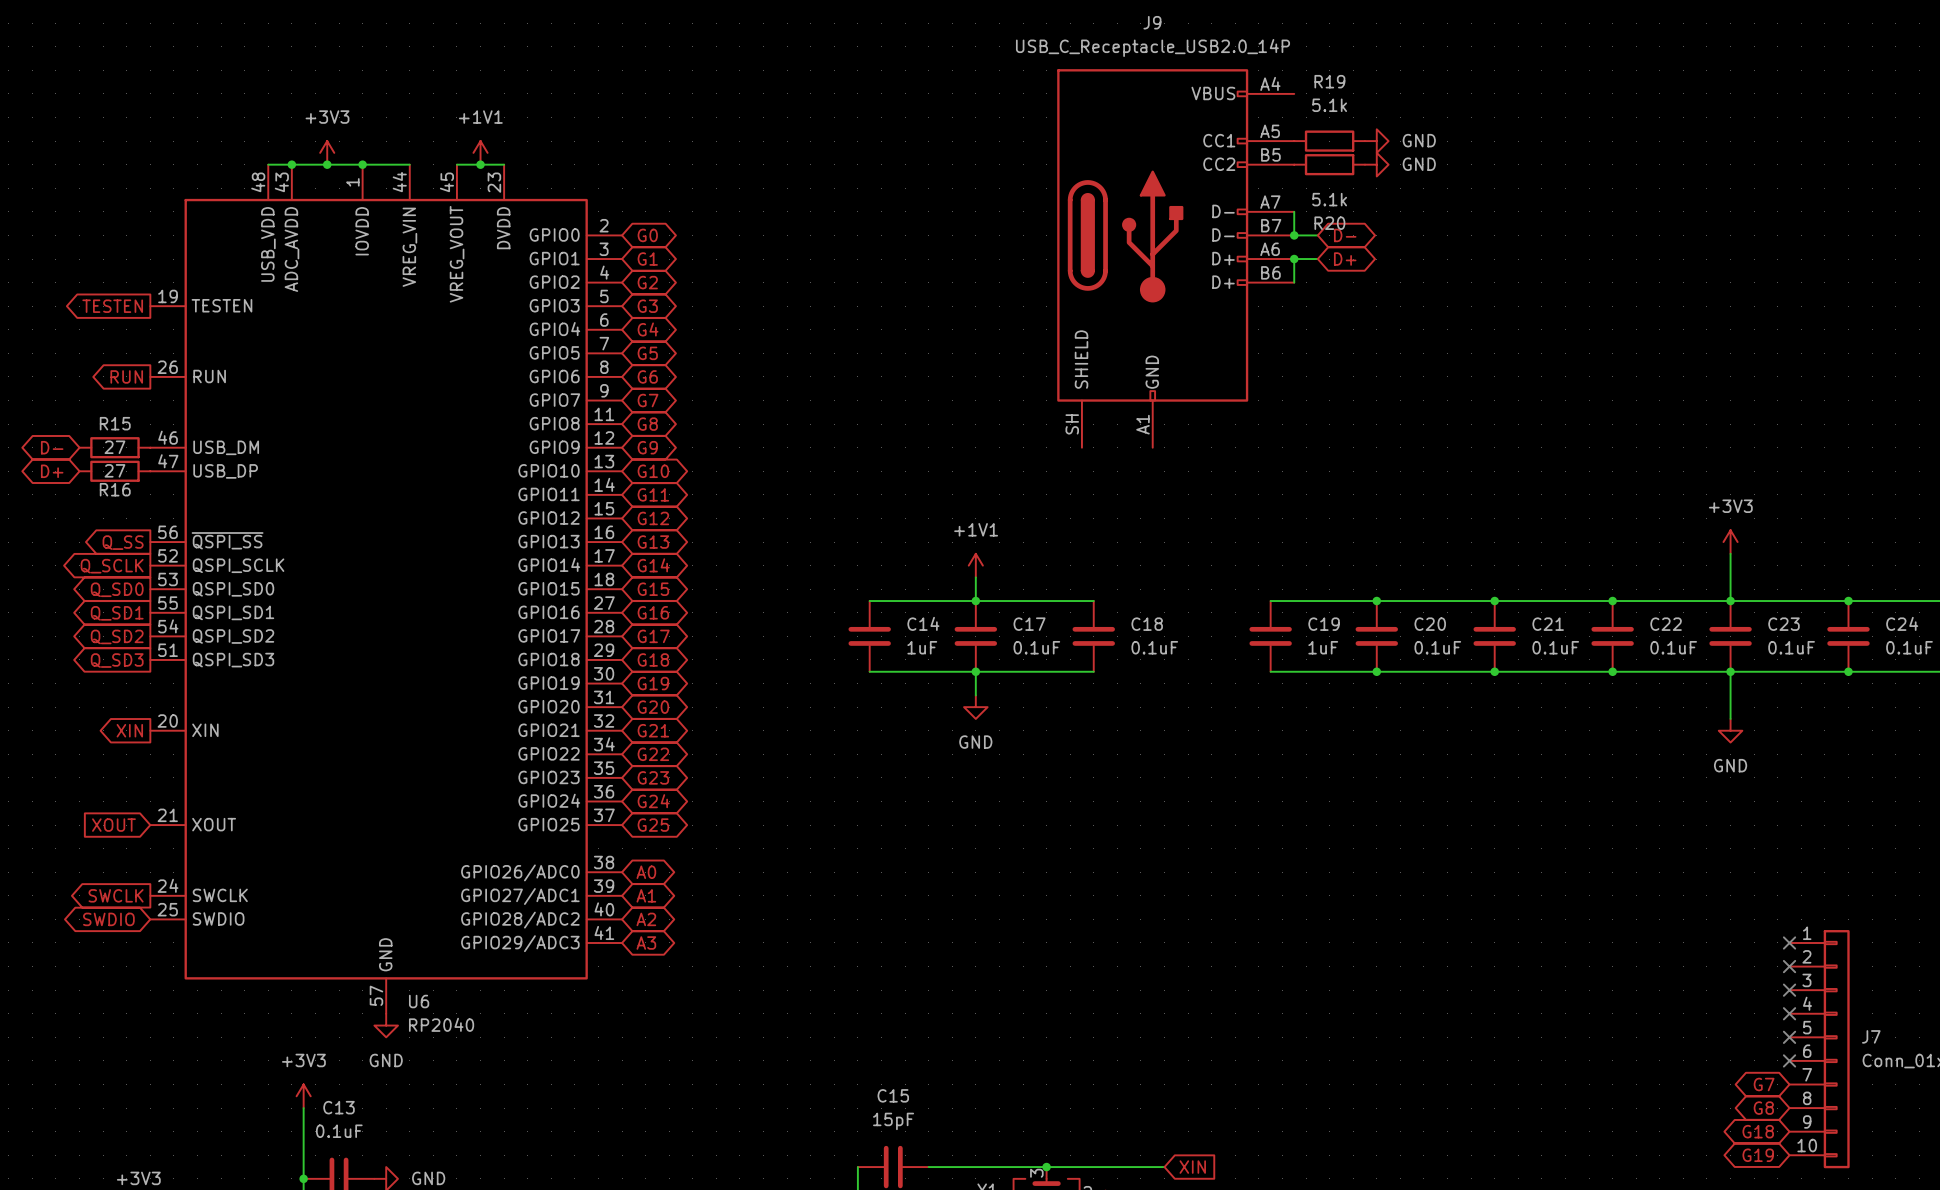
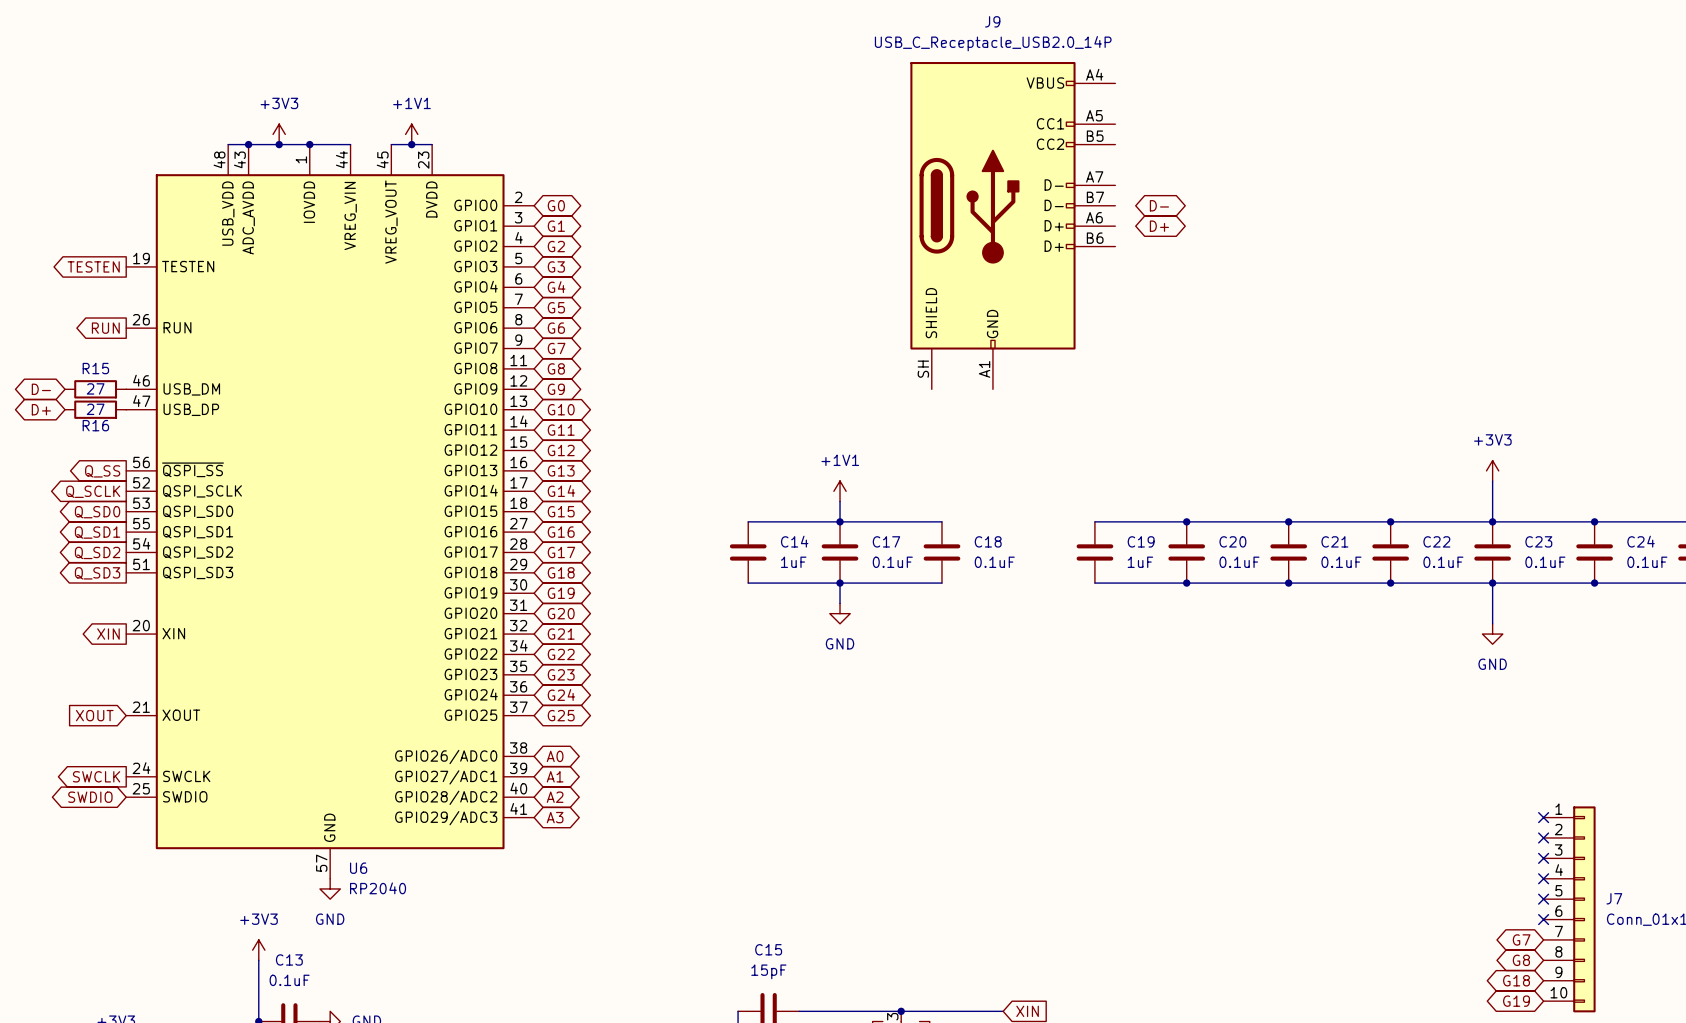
R19: 5.1k (1329, 141) -> none
power symbol: GND (1376, 141) -> none
R20: 5.1k (1329, 164) -> none
power symbol: GND (1376, 164) -> none
wire: (1294, 211) (1294, 235) (1317, 235) -> none
junction: (1294, 235) -> none
junction: (1294, 259) -> none
wire: (1317, 259) (1294, 259) (1294, 282) -> none

